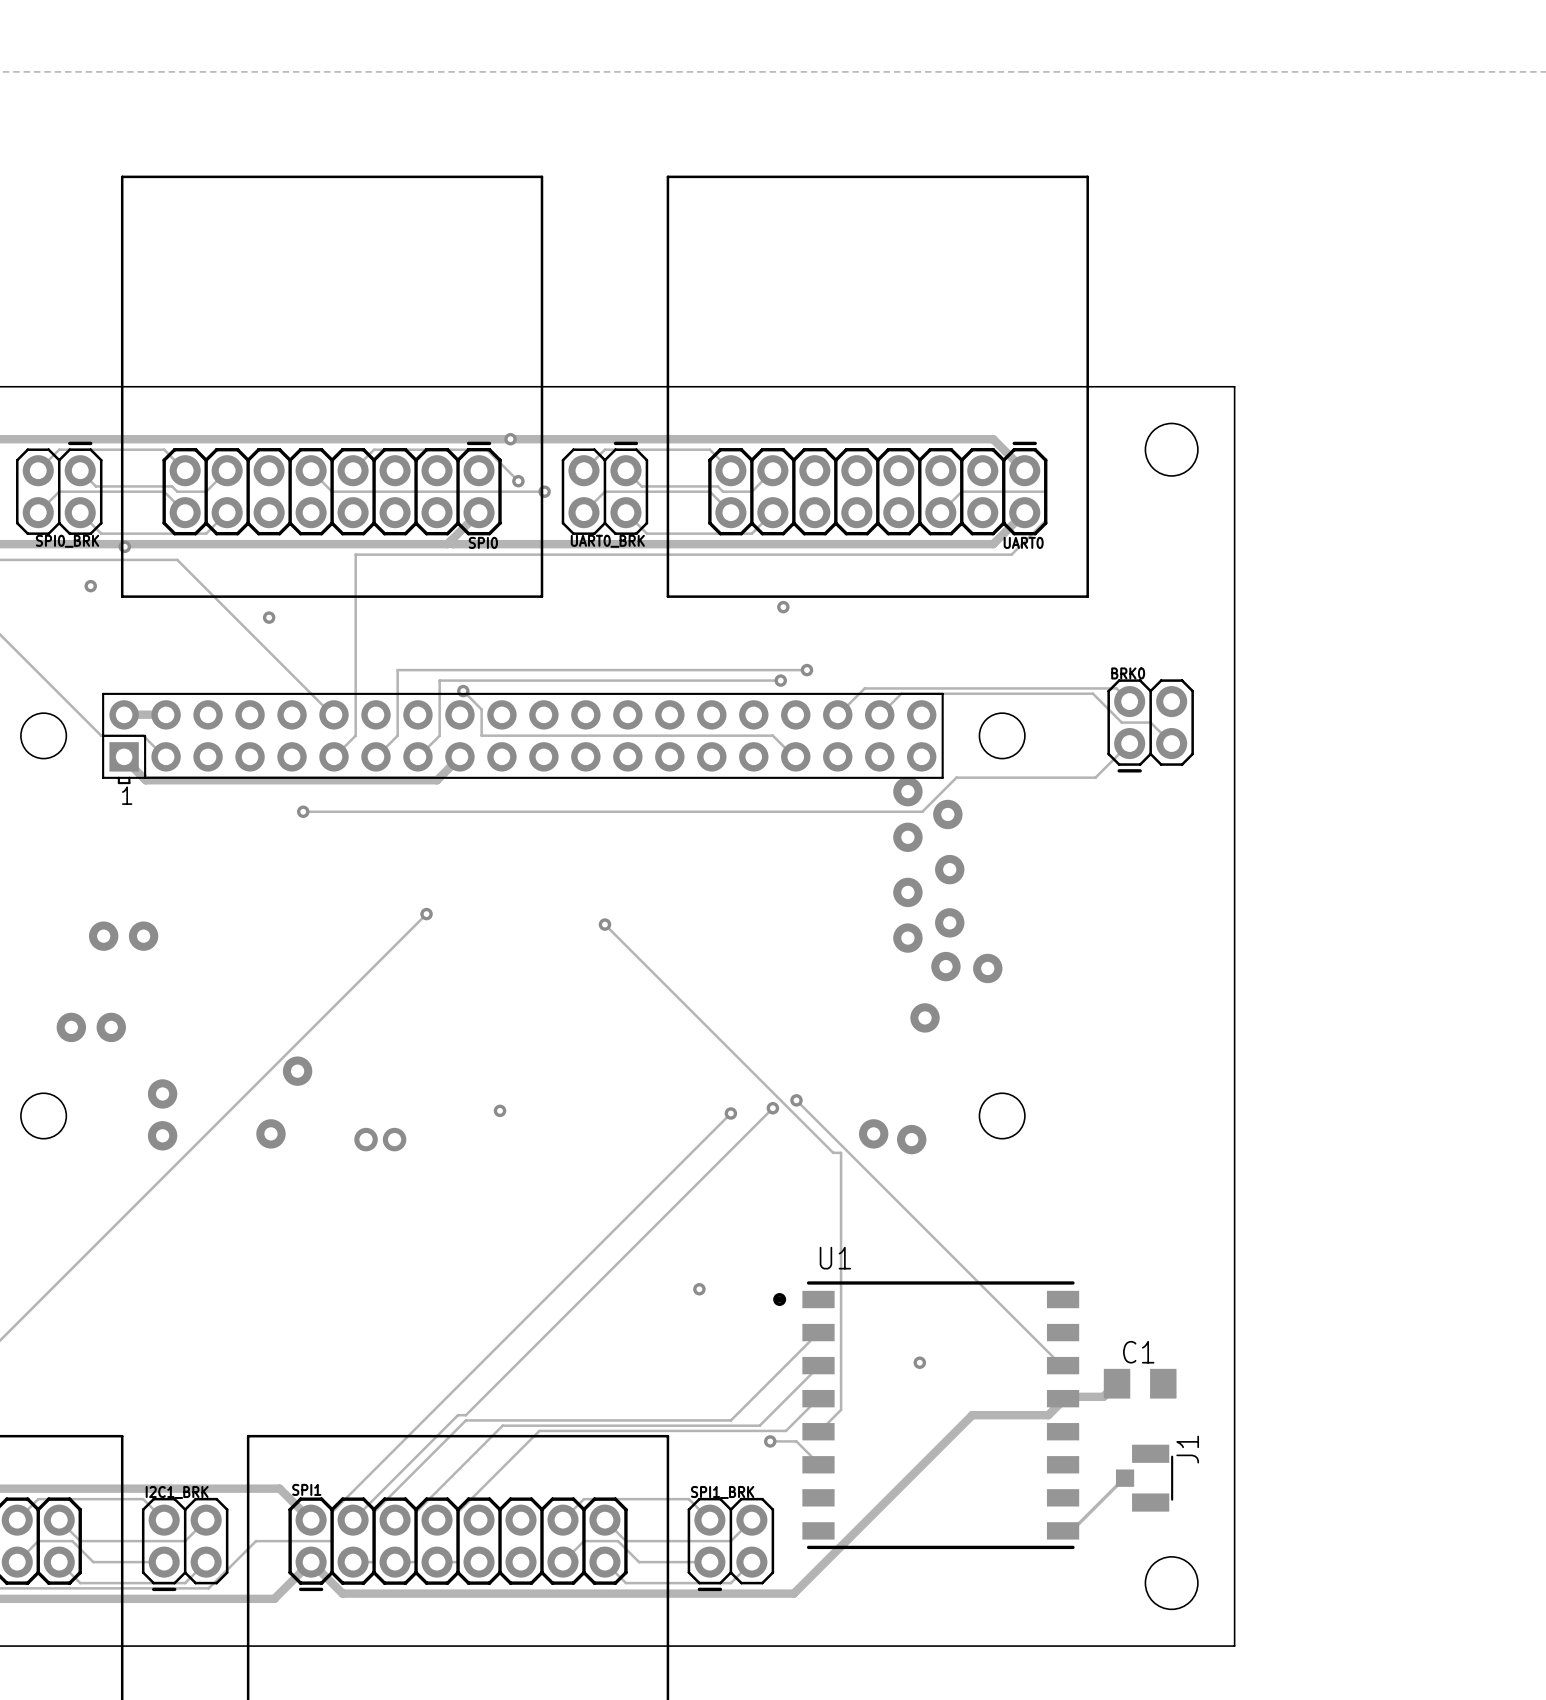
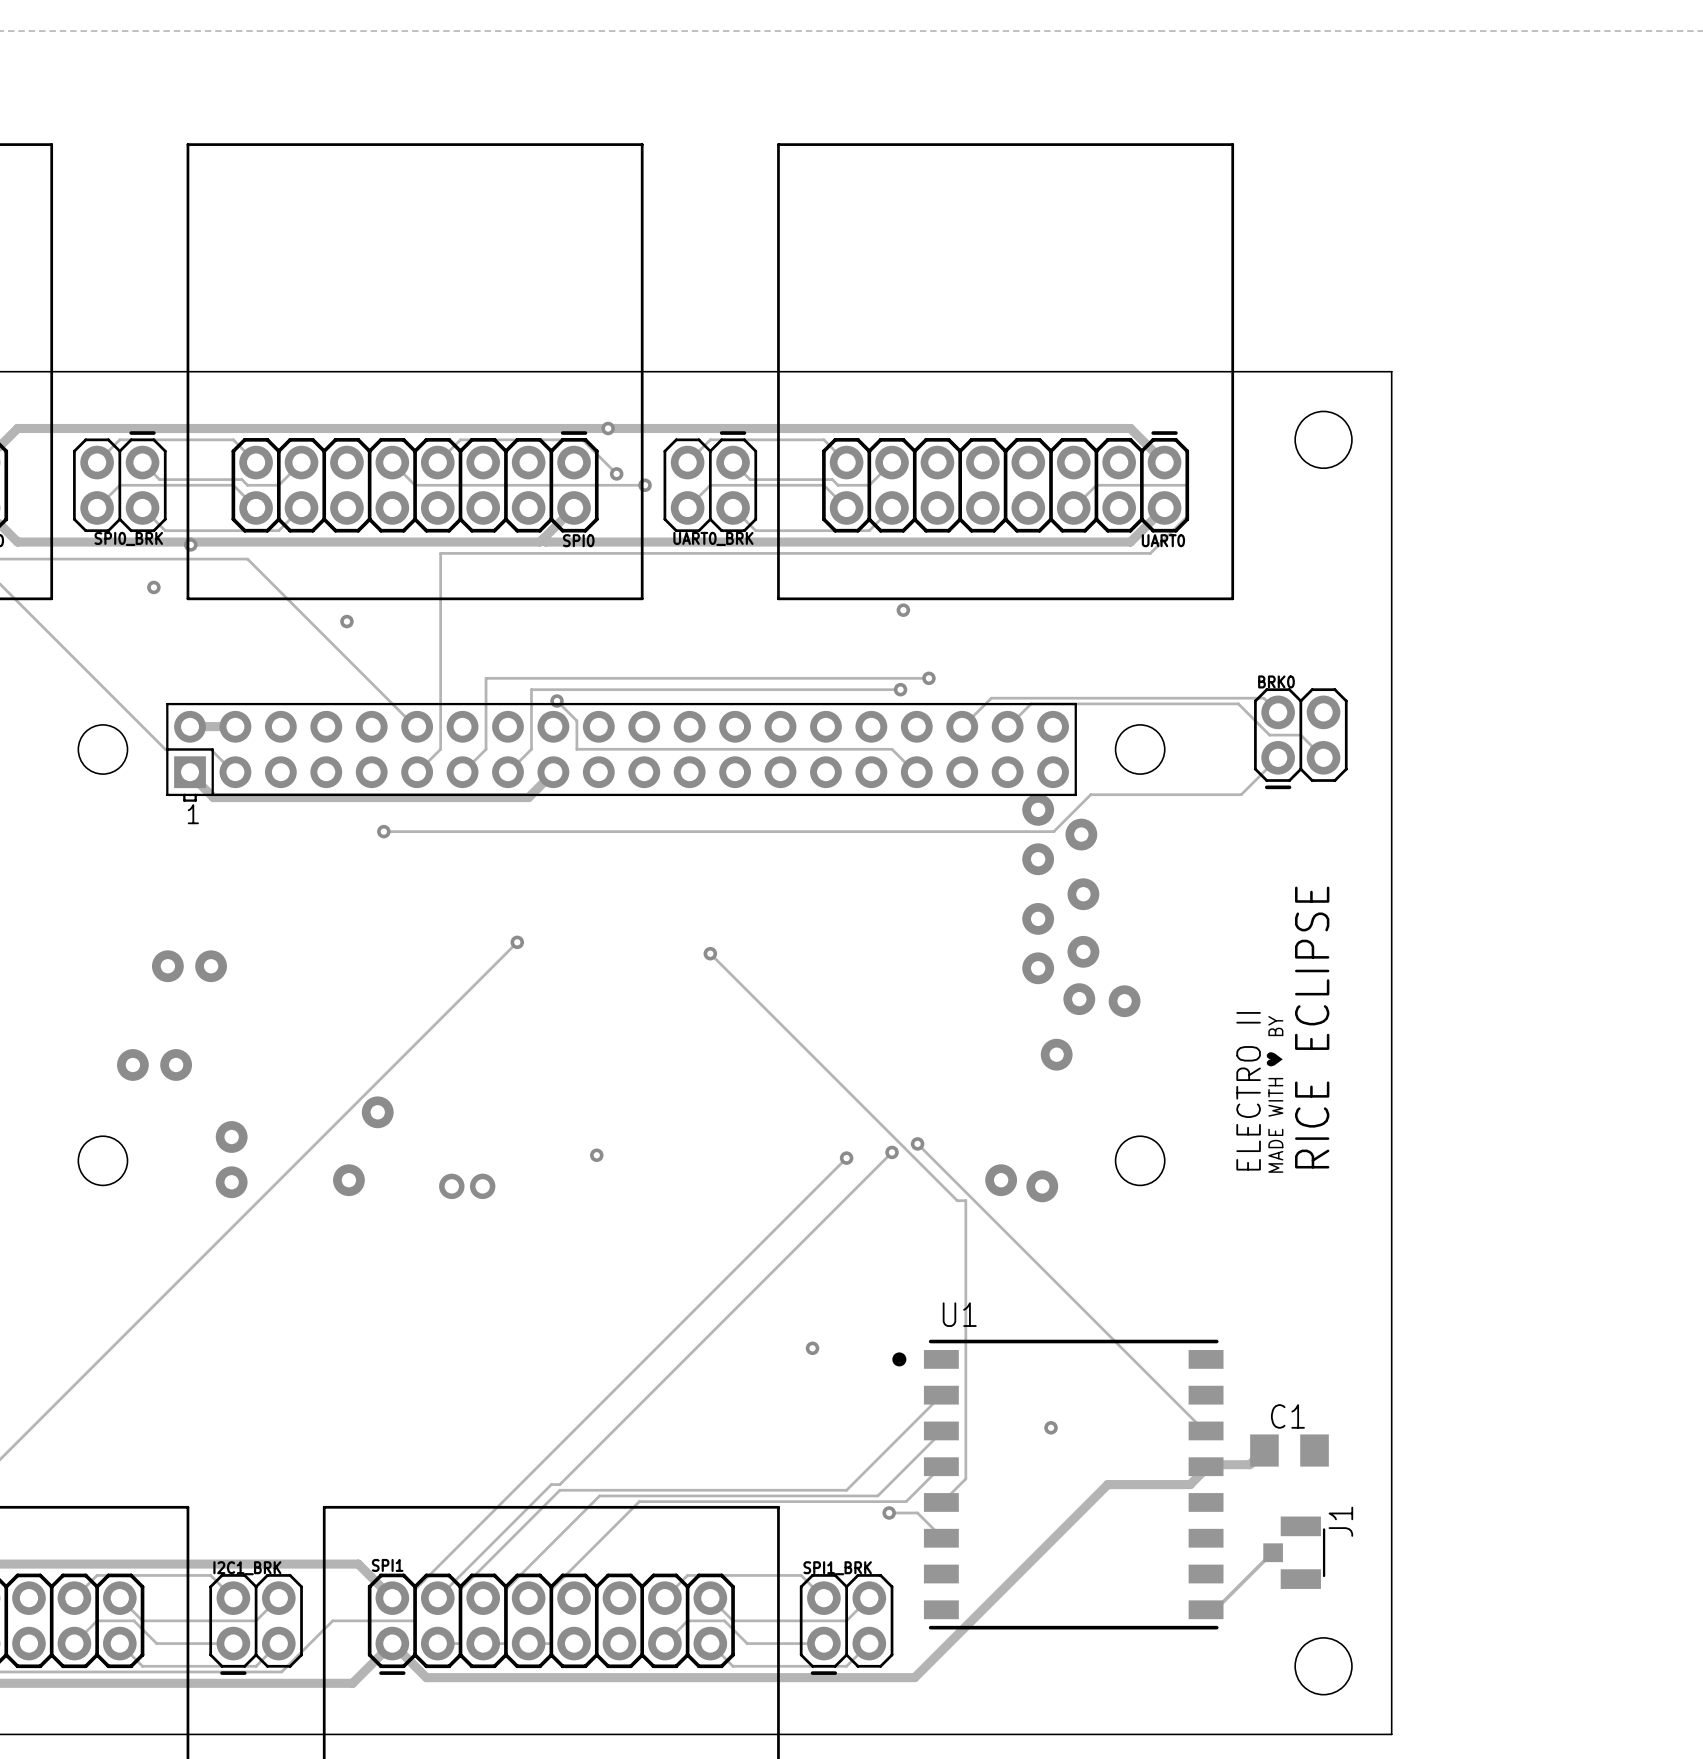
text: none -> RICE ECLIPSE (1312, 1027)
text: none -> ♥ (1274, 1059)
text: none -> ELECTRO II (1248, 1091)
text: none -> MADE WITH BY (1275, 1094)

